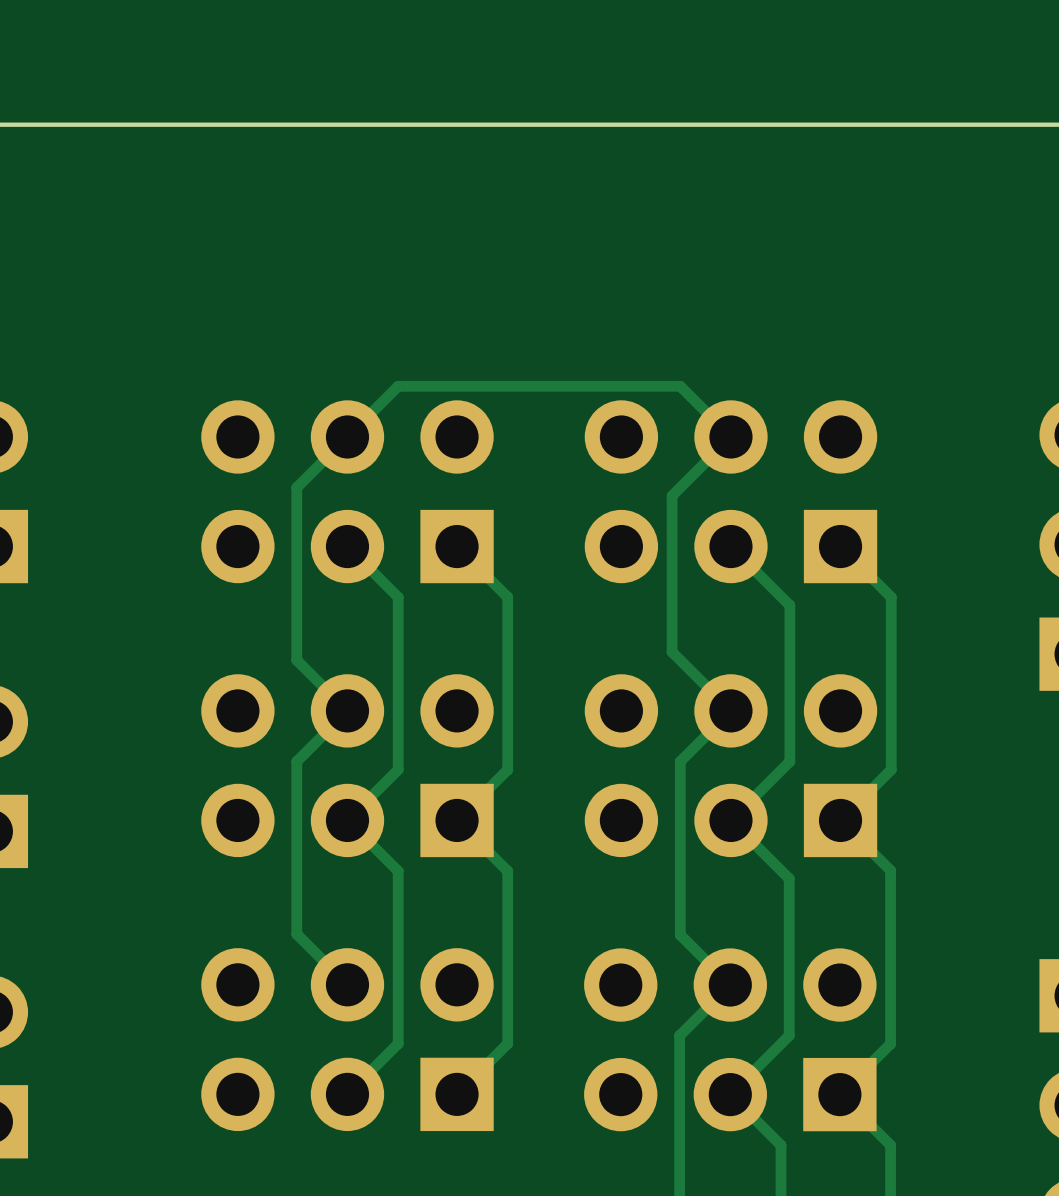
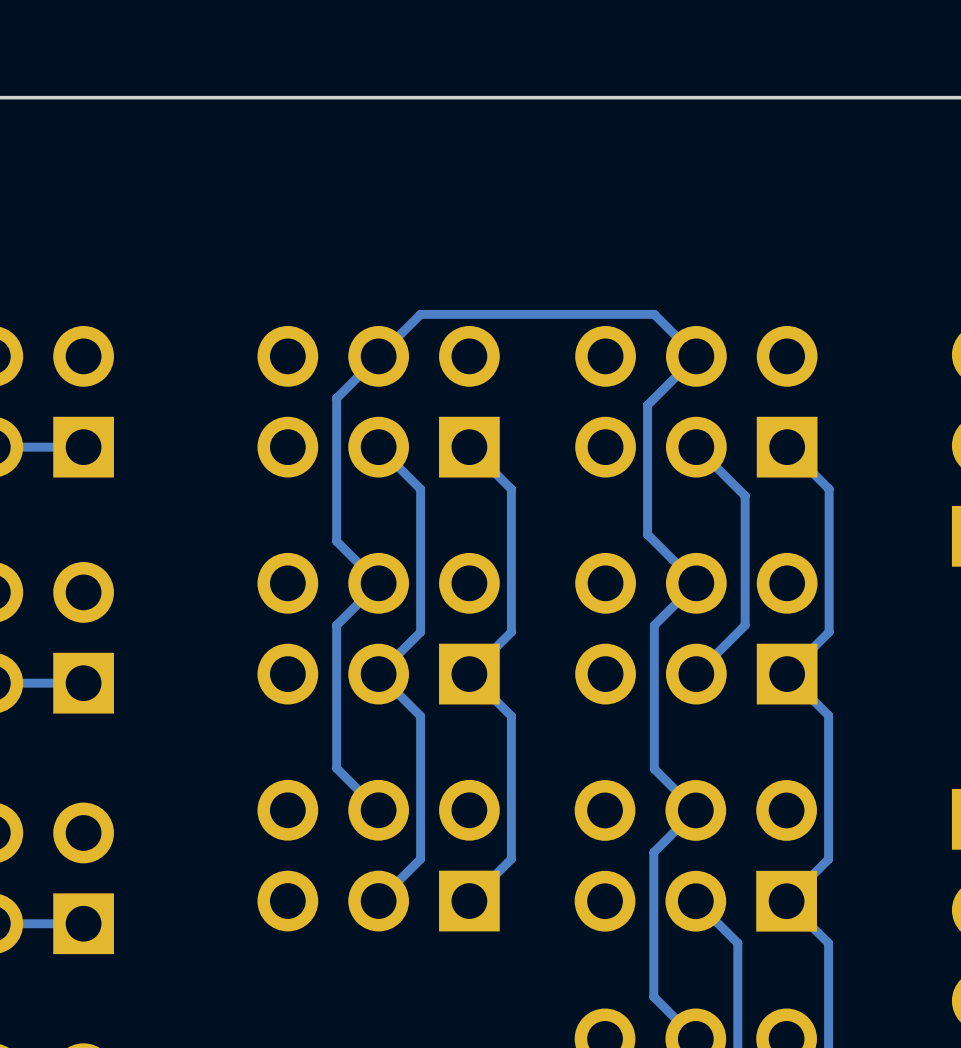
track: (730, 820) (789, 878) (789, 1035) (730, 1094) -> none

